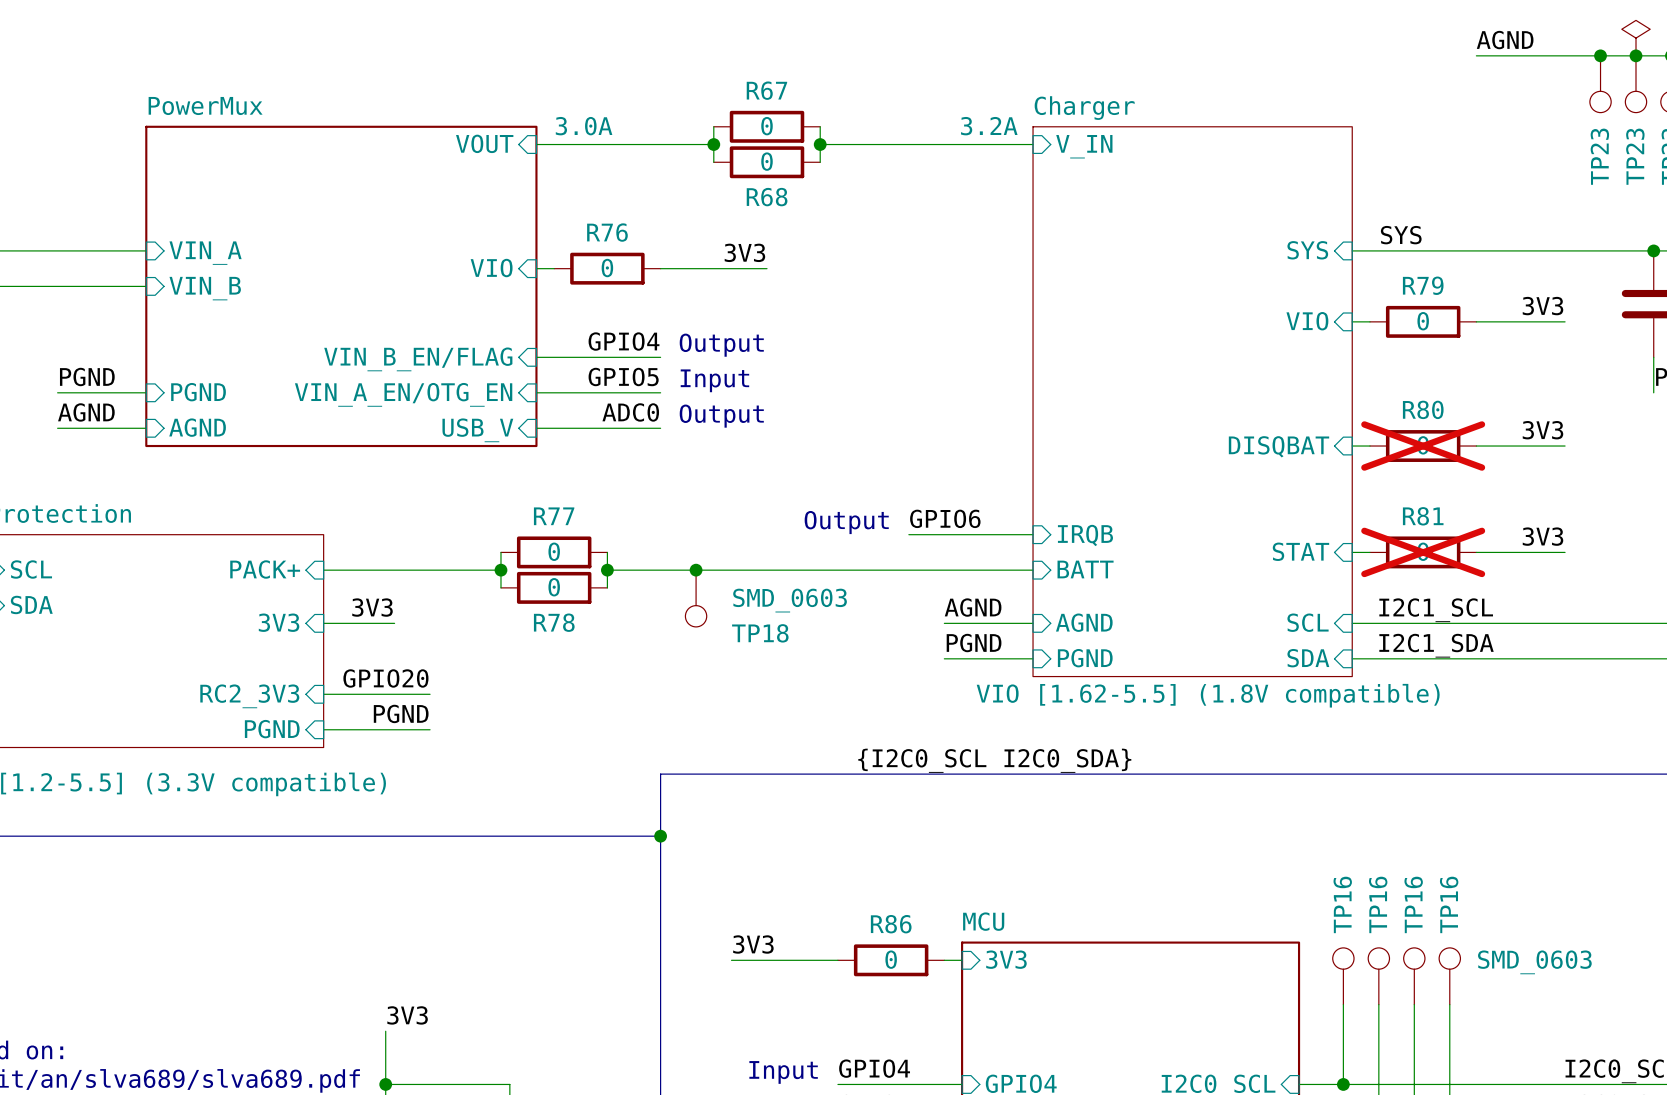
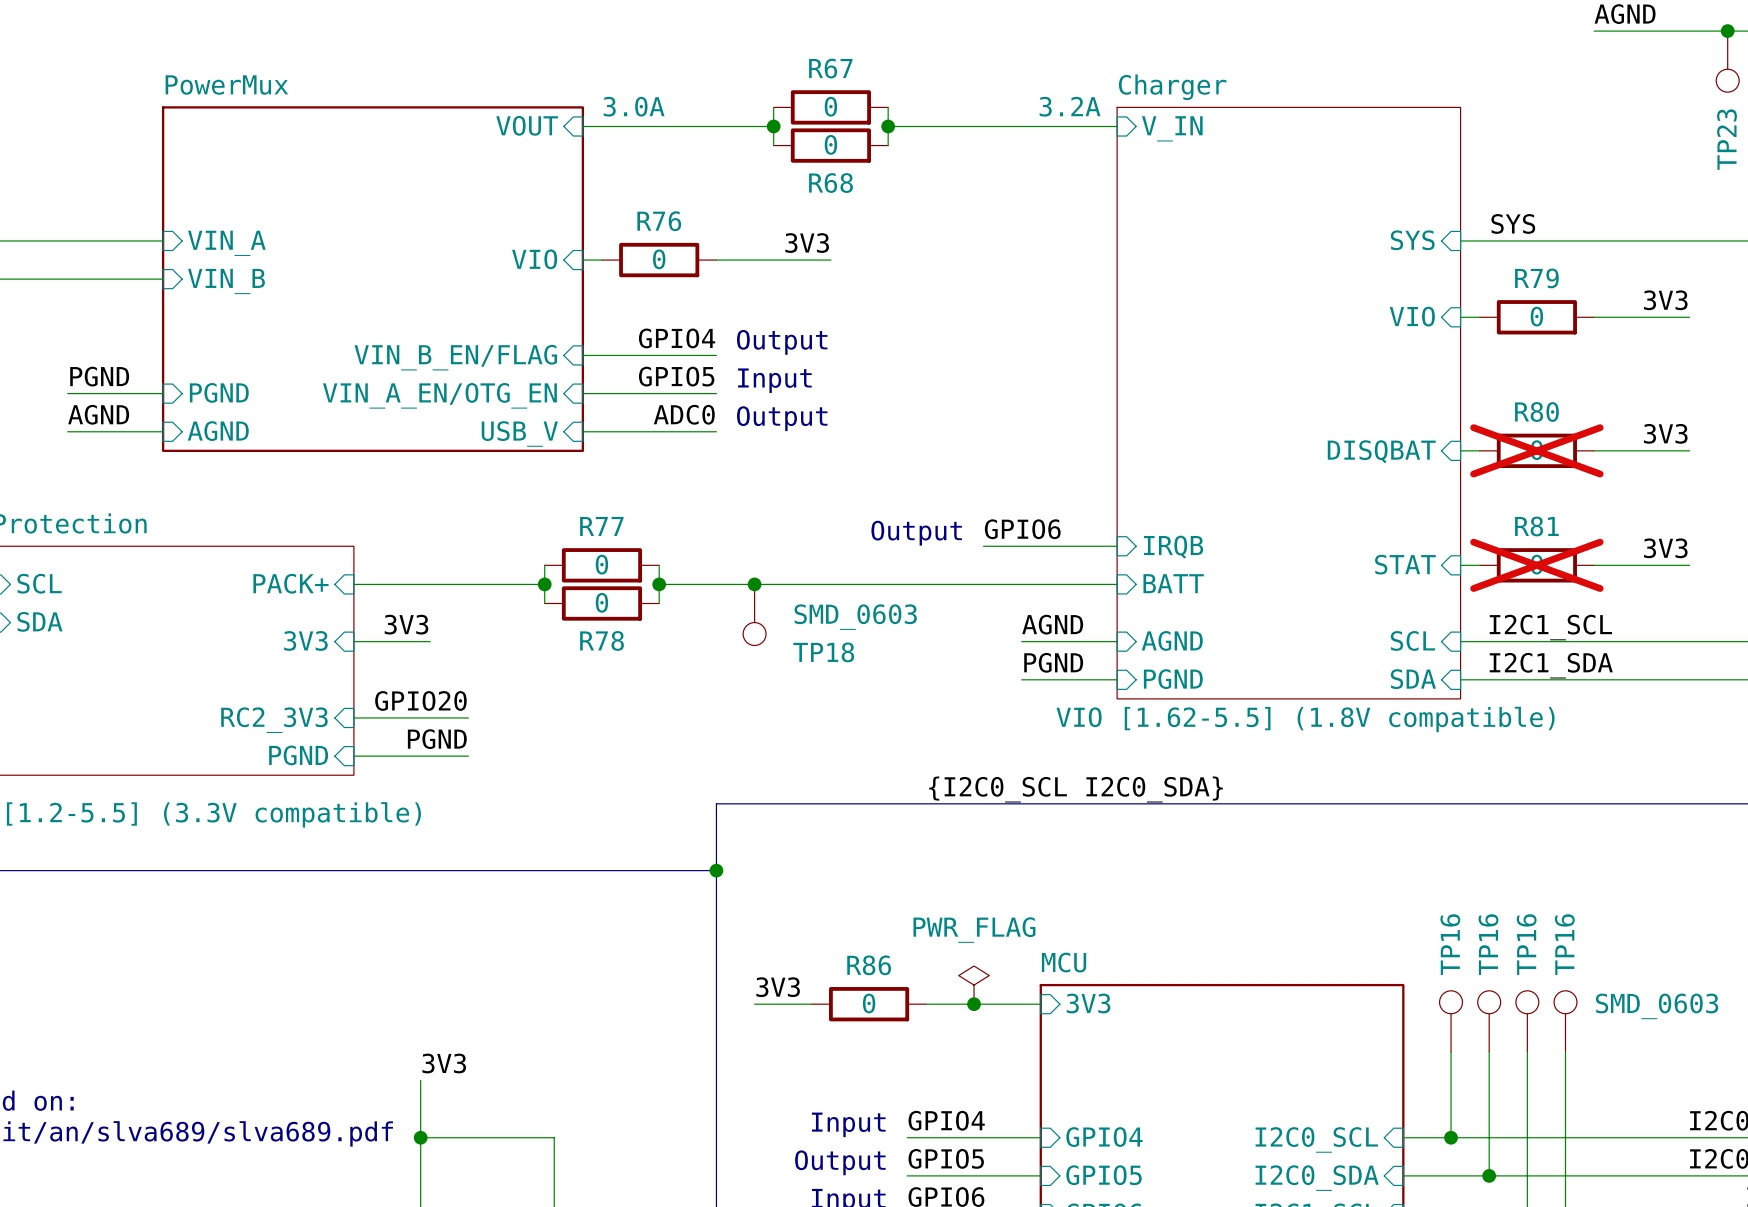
power symbol: none -> PWR_FLAG (974, 985)
label position: 3V3 (753, 944) -> 3V3 (778, 987)
wire: none -> (754, 1004) (792, 1004)
wire: (749, 960) (837, 960) -> (926, 1004) (1021, 1004)
R86 position: (891, 960) -> (869, 1004)
junction: none -> (974, 1004)

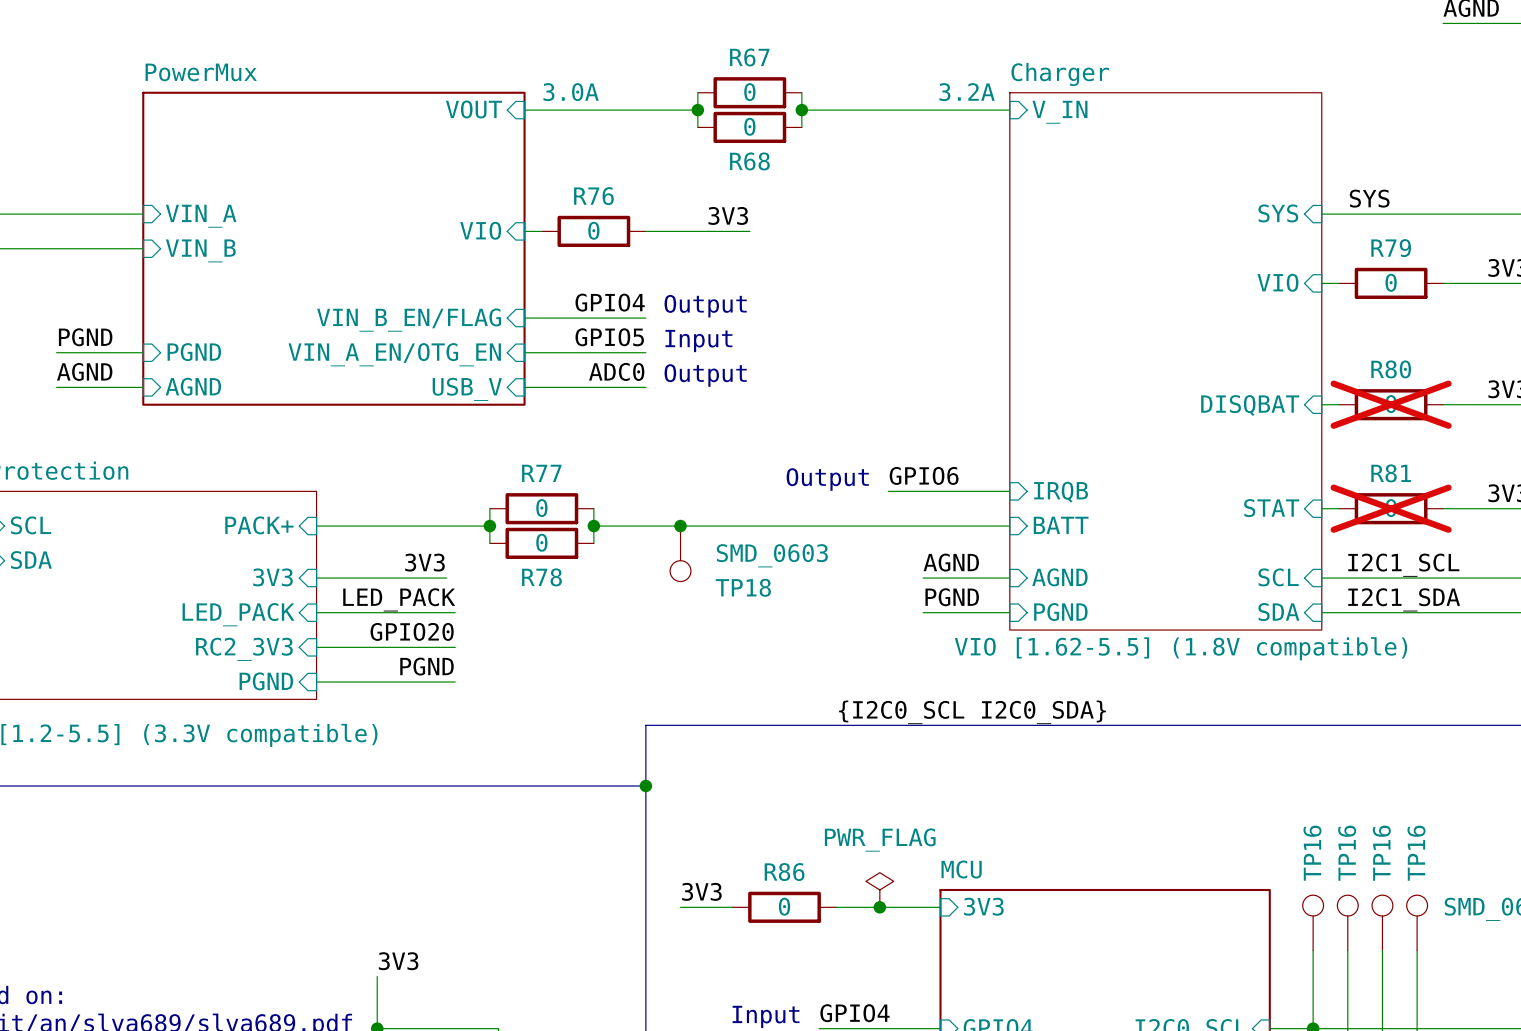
label position: 3V3 (406, 624) -> 3V3 (424, 562)
wire: none -> (385, 578) (446, 578)
label: none -> LED_PACK (399, 599)
wire: none -> (316, 612) (455, 612)
sheet pin: none -> LED_PACK (238, 614)
label position: GPIO20 (420, 700) -> GPIO20 (412, 631)
wire: none -> (420, 647) (455, 647)
label position: PGND (437, 739) -> PGND (427, 666)
wire: none -> (420, 682) (455, 682)

